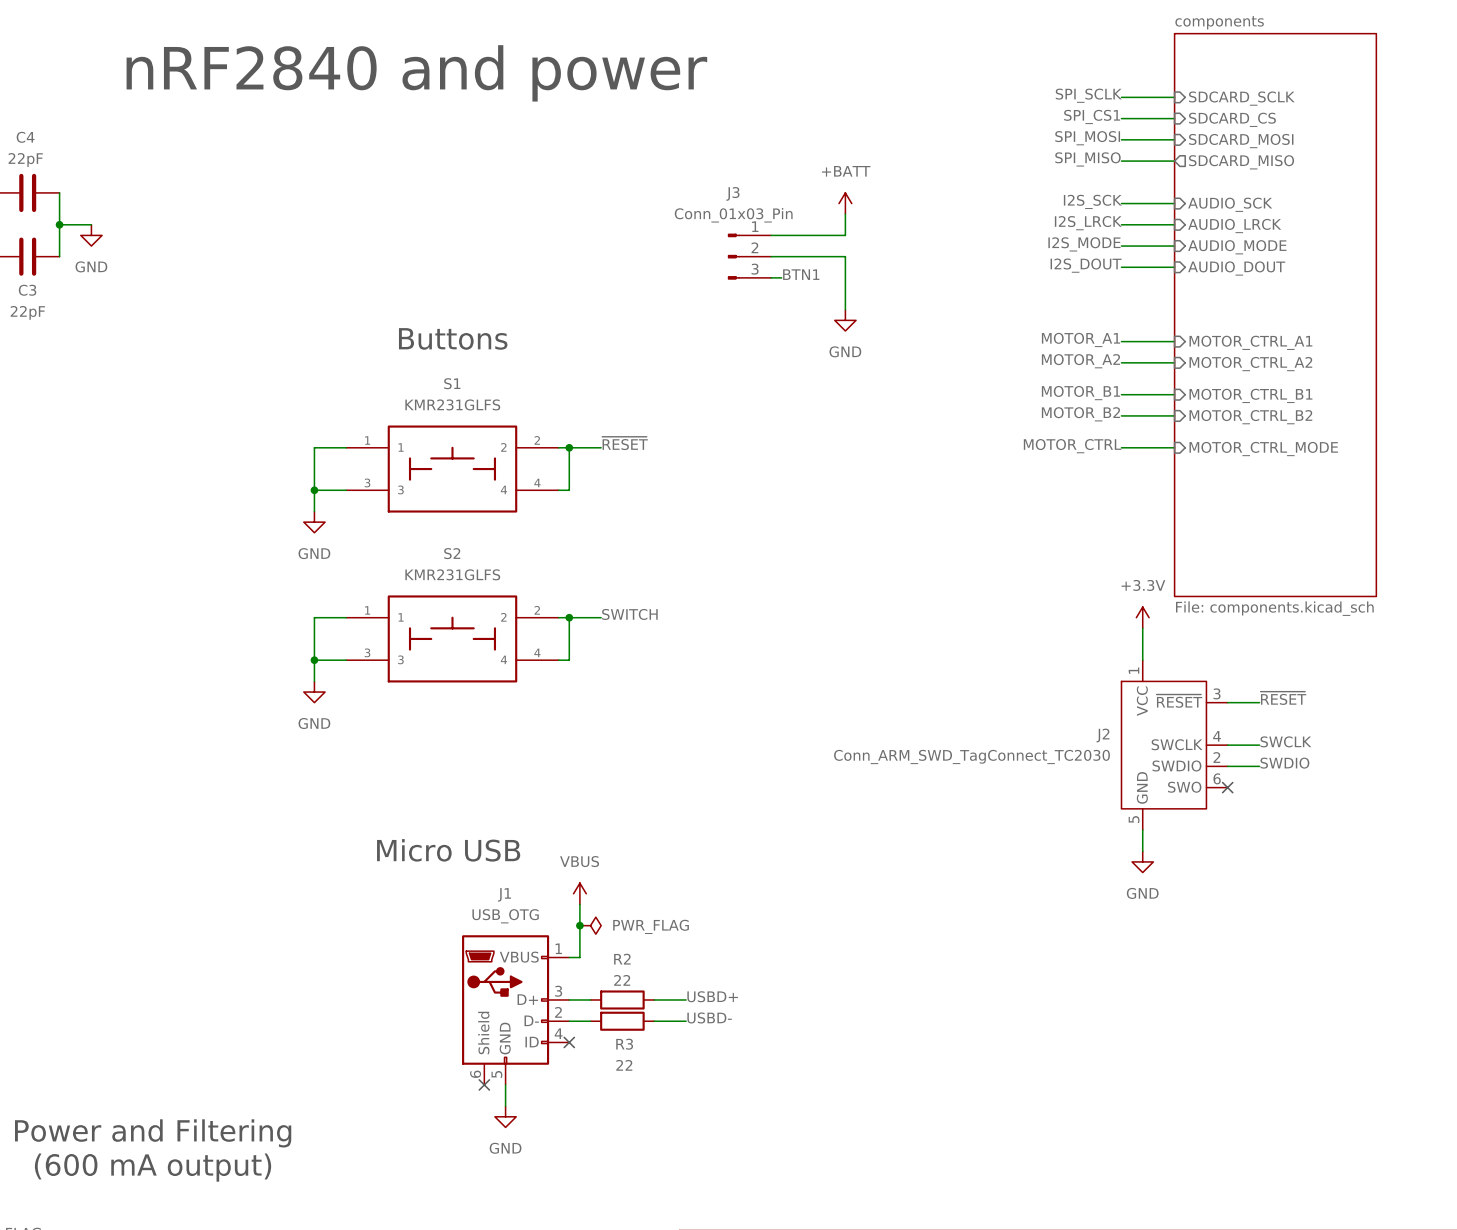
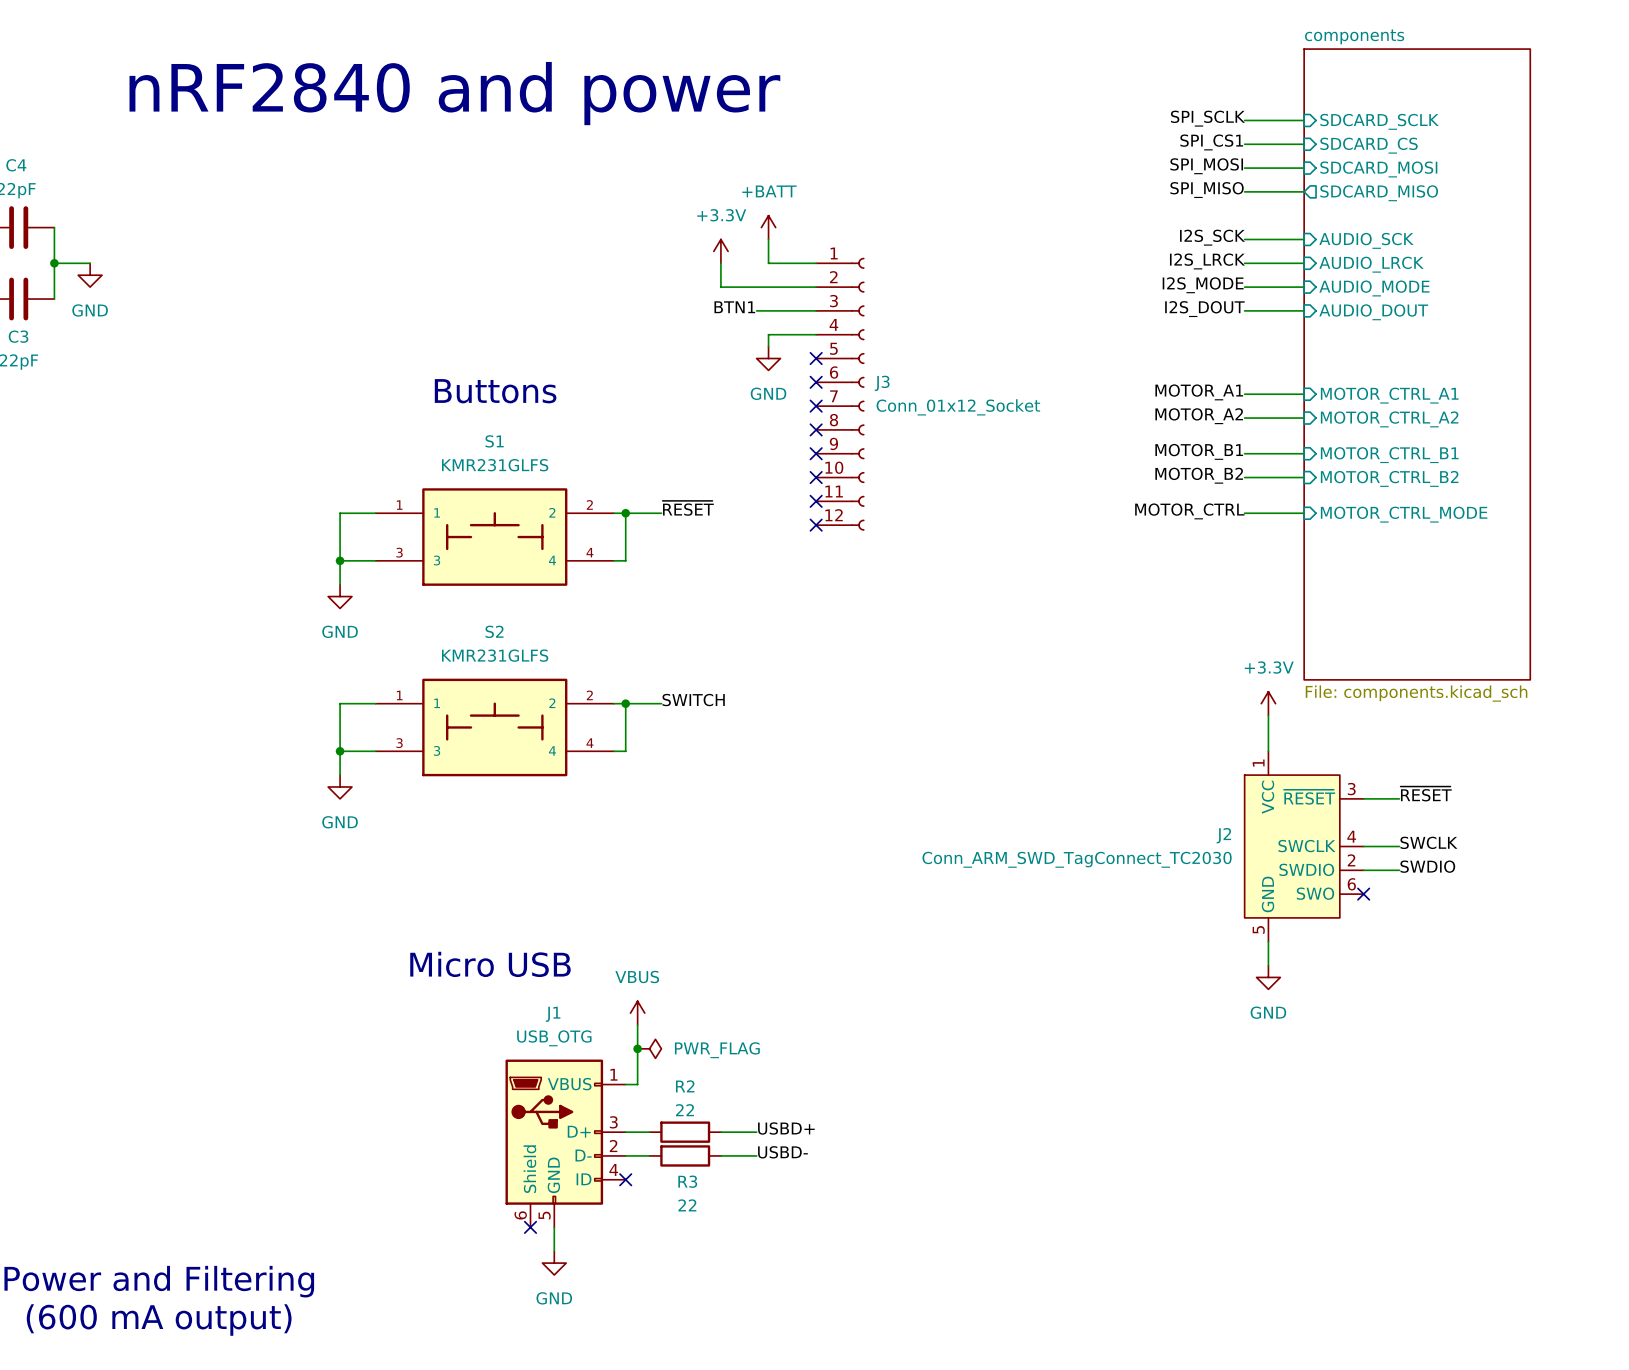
J3 name position: J3 (732, 193) -> J3 (882, 383)
wire: none -> (768, 239) (768, 263) (816, 263)
power symbol position: +BATT (845, 203) -> +BATT (768, 227)
power symbol: none -> +3.3V (720, 251)
wire: (845, 214) (845, 235) (771, 235) -> none
J3 value: Conn_01x03_Pin (733, 215) -> Conn_01x12_Socket (958, 407)
wire: none -> (720, 263) (720, 287) (816, 287)
J3 symbol: [727, 233, 772, 280] -> [816, 257, 865, 531]
wire: (771, 256) (845, 256) (845, 309) -> none
wire: none -> (756, 310) (816, 310)
label position: BTN1 (801, 274) -> BTN1 (734, 307)
wire: (771, 277) (781, 277) -> none
wire: none -> (816, 334) (768, 334) (768, 346)
no-connect mark: none -> (816, 358)
power symbol position: GND (845, 320) -> GND (768, 358)
no-connect mark: none -> (816, 382)
no-connect mark: none -> (816, 406)
no-connect mark: none -> (816, 429)
no-connect mark: none -> (816, 453)
no-connect mark: none -> (816, 477)
no-connect mark: none -> (816, 501)
no-connect mark: none -> (816, 525)

